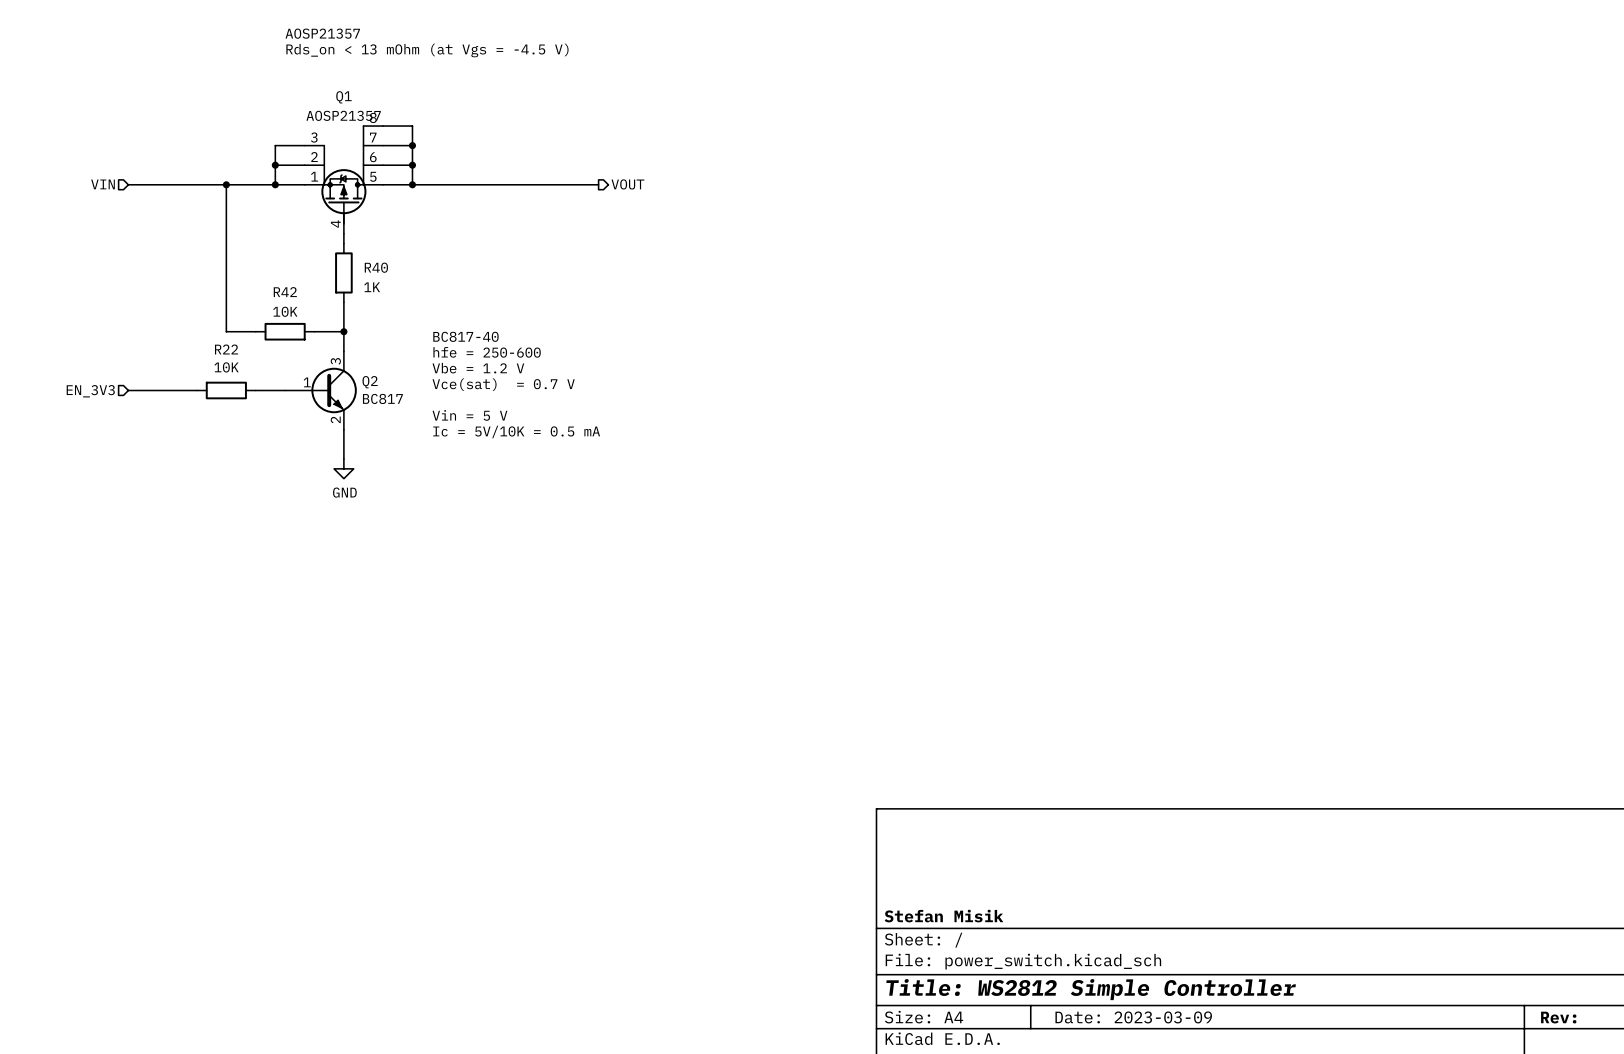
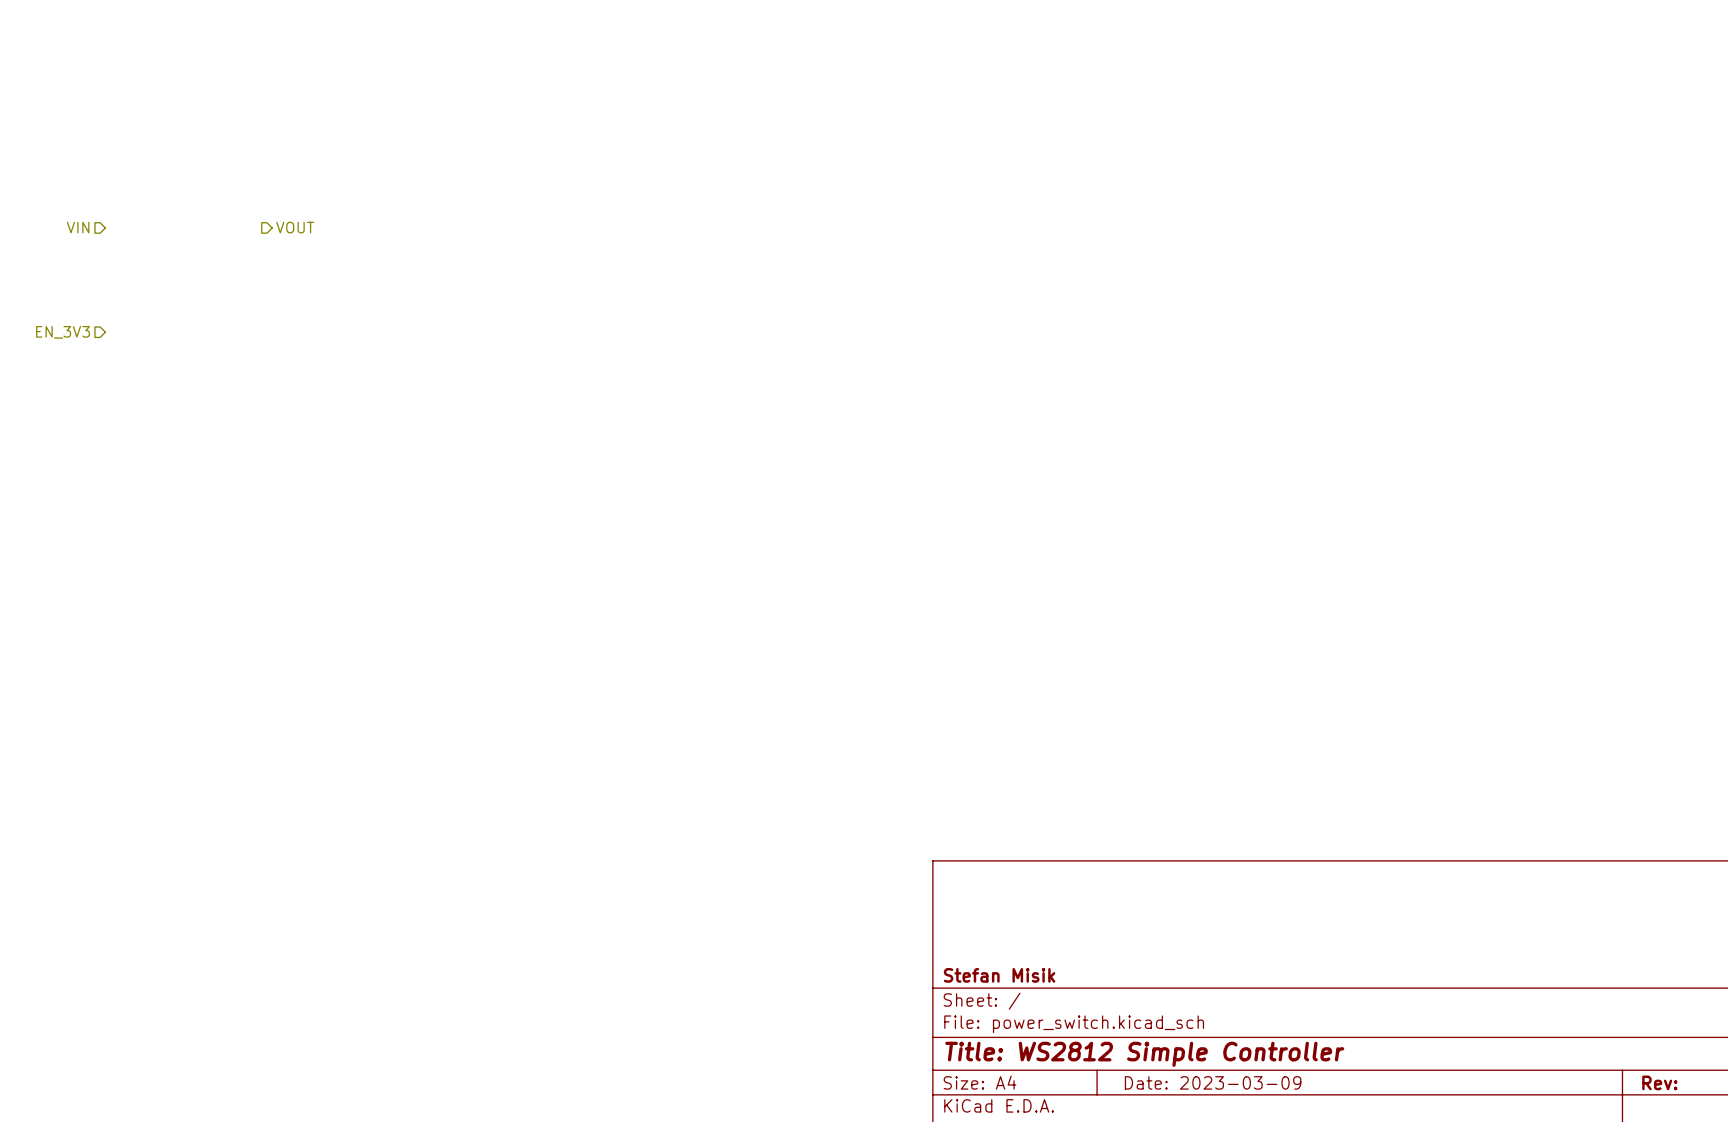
text: AOSP21357 (322, 33) -> none
text: Rds_on < 13 mOhm (at Vgs = -4.5 V) (427, 50) -> none
wire: (383, 126) (412, 126) (412, 184) -> none
wire: (304, 145) (275, 145) (275, 184) -> none
wire: (383, 145) (412, 145) -> none
junction: (412, 145) -> none
wire: (275, 165) (304, 165) -> none
junction: (275, 165) -> none
wire: (383, 165) (412, 165) -> none
junction: (412, 165) -> none
Q1: AOSP21357 (343, 179) -> none
hierarchical label position: VIN (103, 184) -> VIN (78, 227)
wire: (128, 184) (304, 184) -> none
wire: (226, 184) (226, 331) (255, 331) -> none
junction: (226, 184) -> none
junction: (275, 184) -> none
wire: (383, 184) (598, 184) -> none
junction: (412, 184) -> none
hierarchical label: VOUT (627, 184) -> none
hierarchical label: none -> VOUT (295, 227)
wire: (343, 233) (343, 243) -> none
R40: 1K (343, 272) -> none
wire: (343, 302) (343, 351) -> none
R42: 10K (285, 331) -> none
wire: (314, 331) (343, 331) -> none
junction: (343, 331) -> none
text: BC817-40 (465, 336) -> none
text: hfe = 250-600 (487, 352) -> none
text: Vbe = 1.2 V (478, 368) -> none
text: Vce(sat) = 0.7 V (503, 384) -> none
wire: (128, 390) (196, 390) -> none
R22: 10K (226, 390) -> none
wire: (255, 390) (285, 390) -> none
Q2: BC817 (320, 390) -> none
hierarchical label position: EN_3V3 (90, 391) -> EN_3V3 (63, 332)
text: Vin = 5 V (469, 415) -> none
wire: (343, 429) (343, 459) -> none
text: Ic = 5V/10K = 0.5 mA (516, 431) -> none
power symbol: GND (343, 468) -> none

